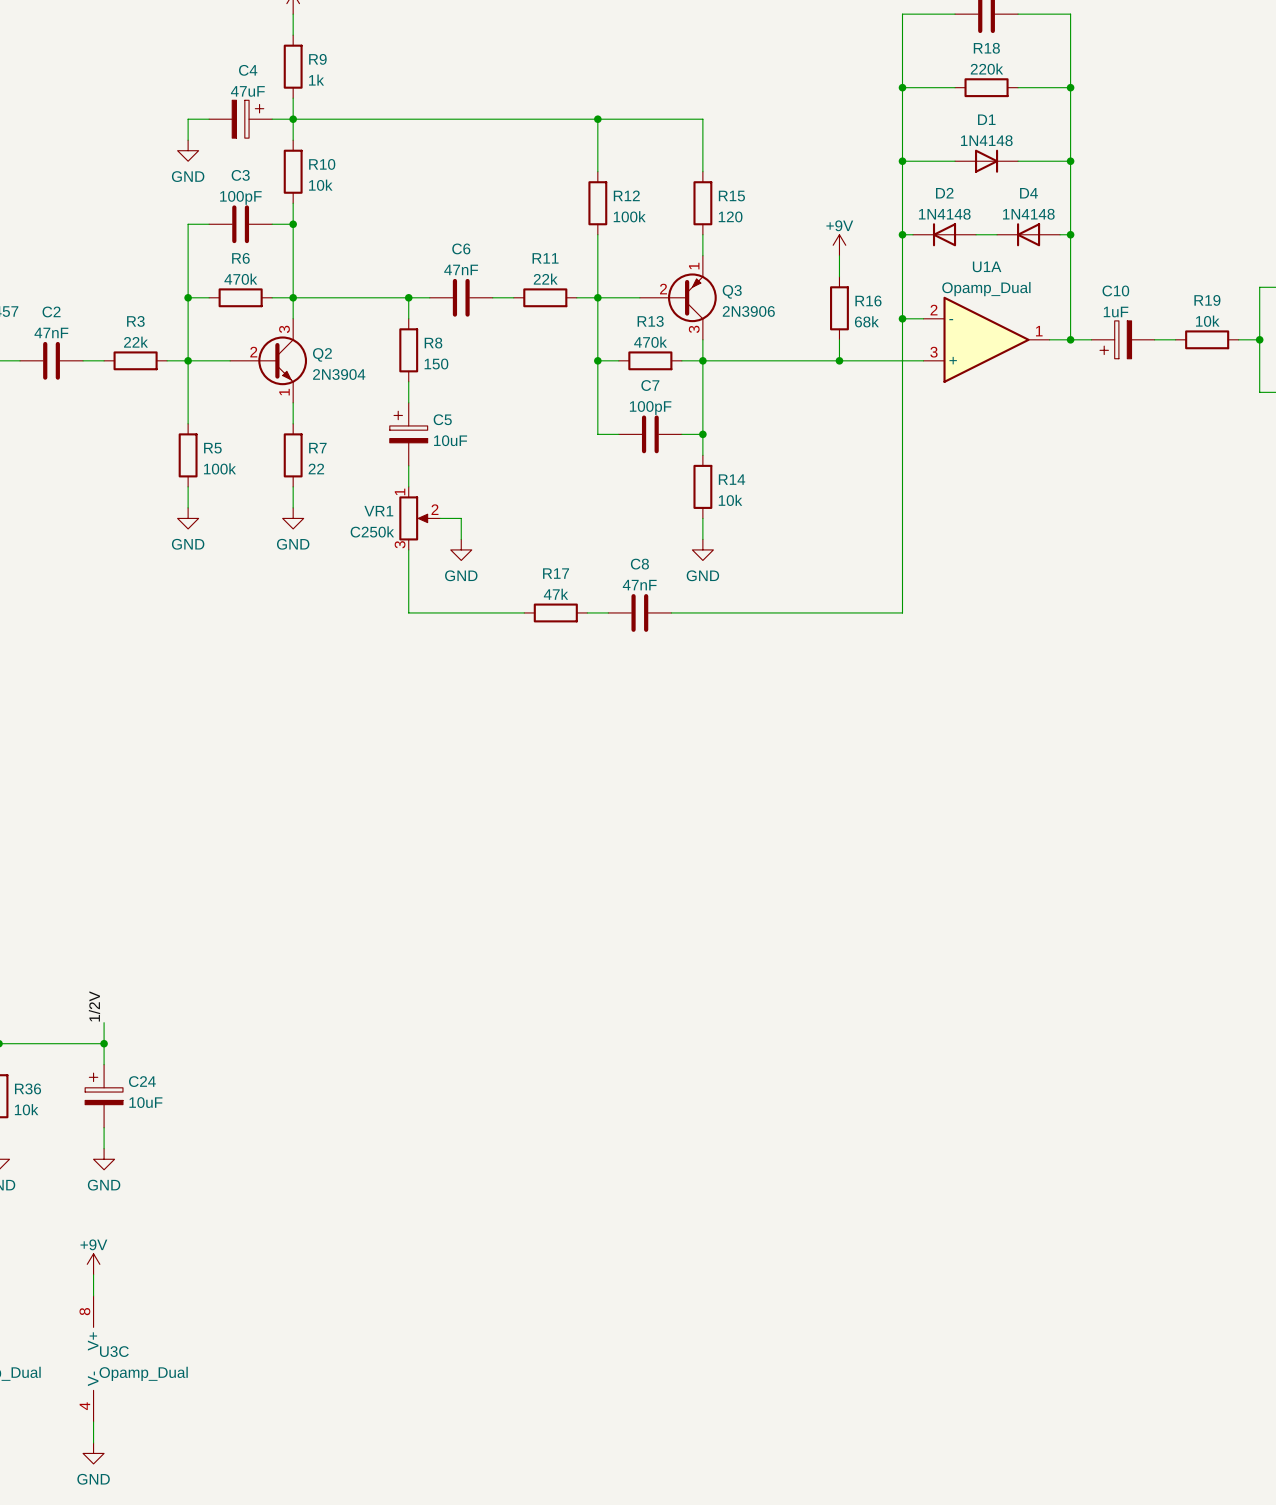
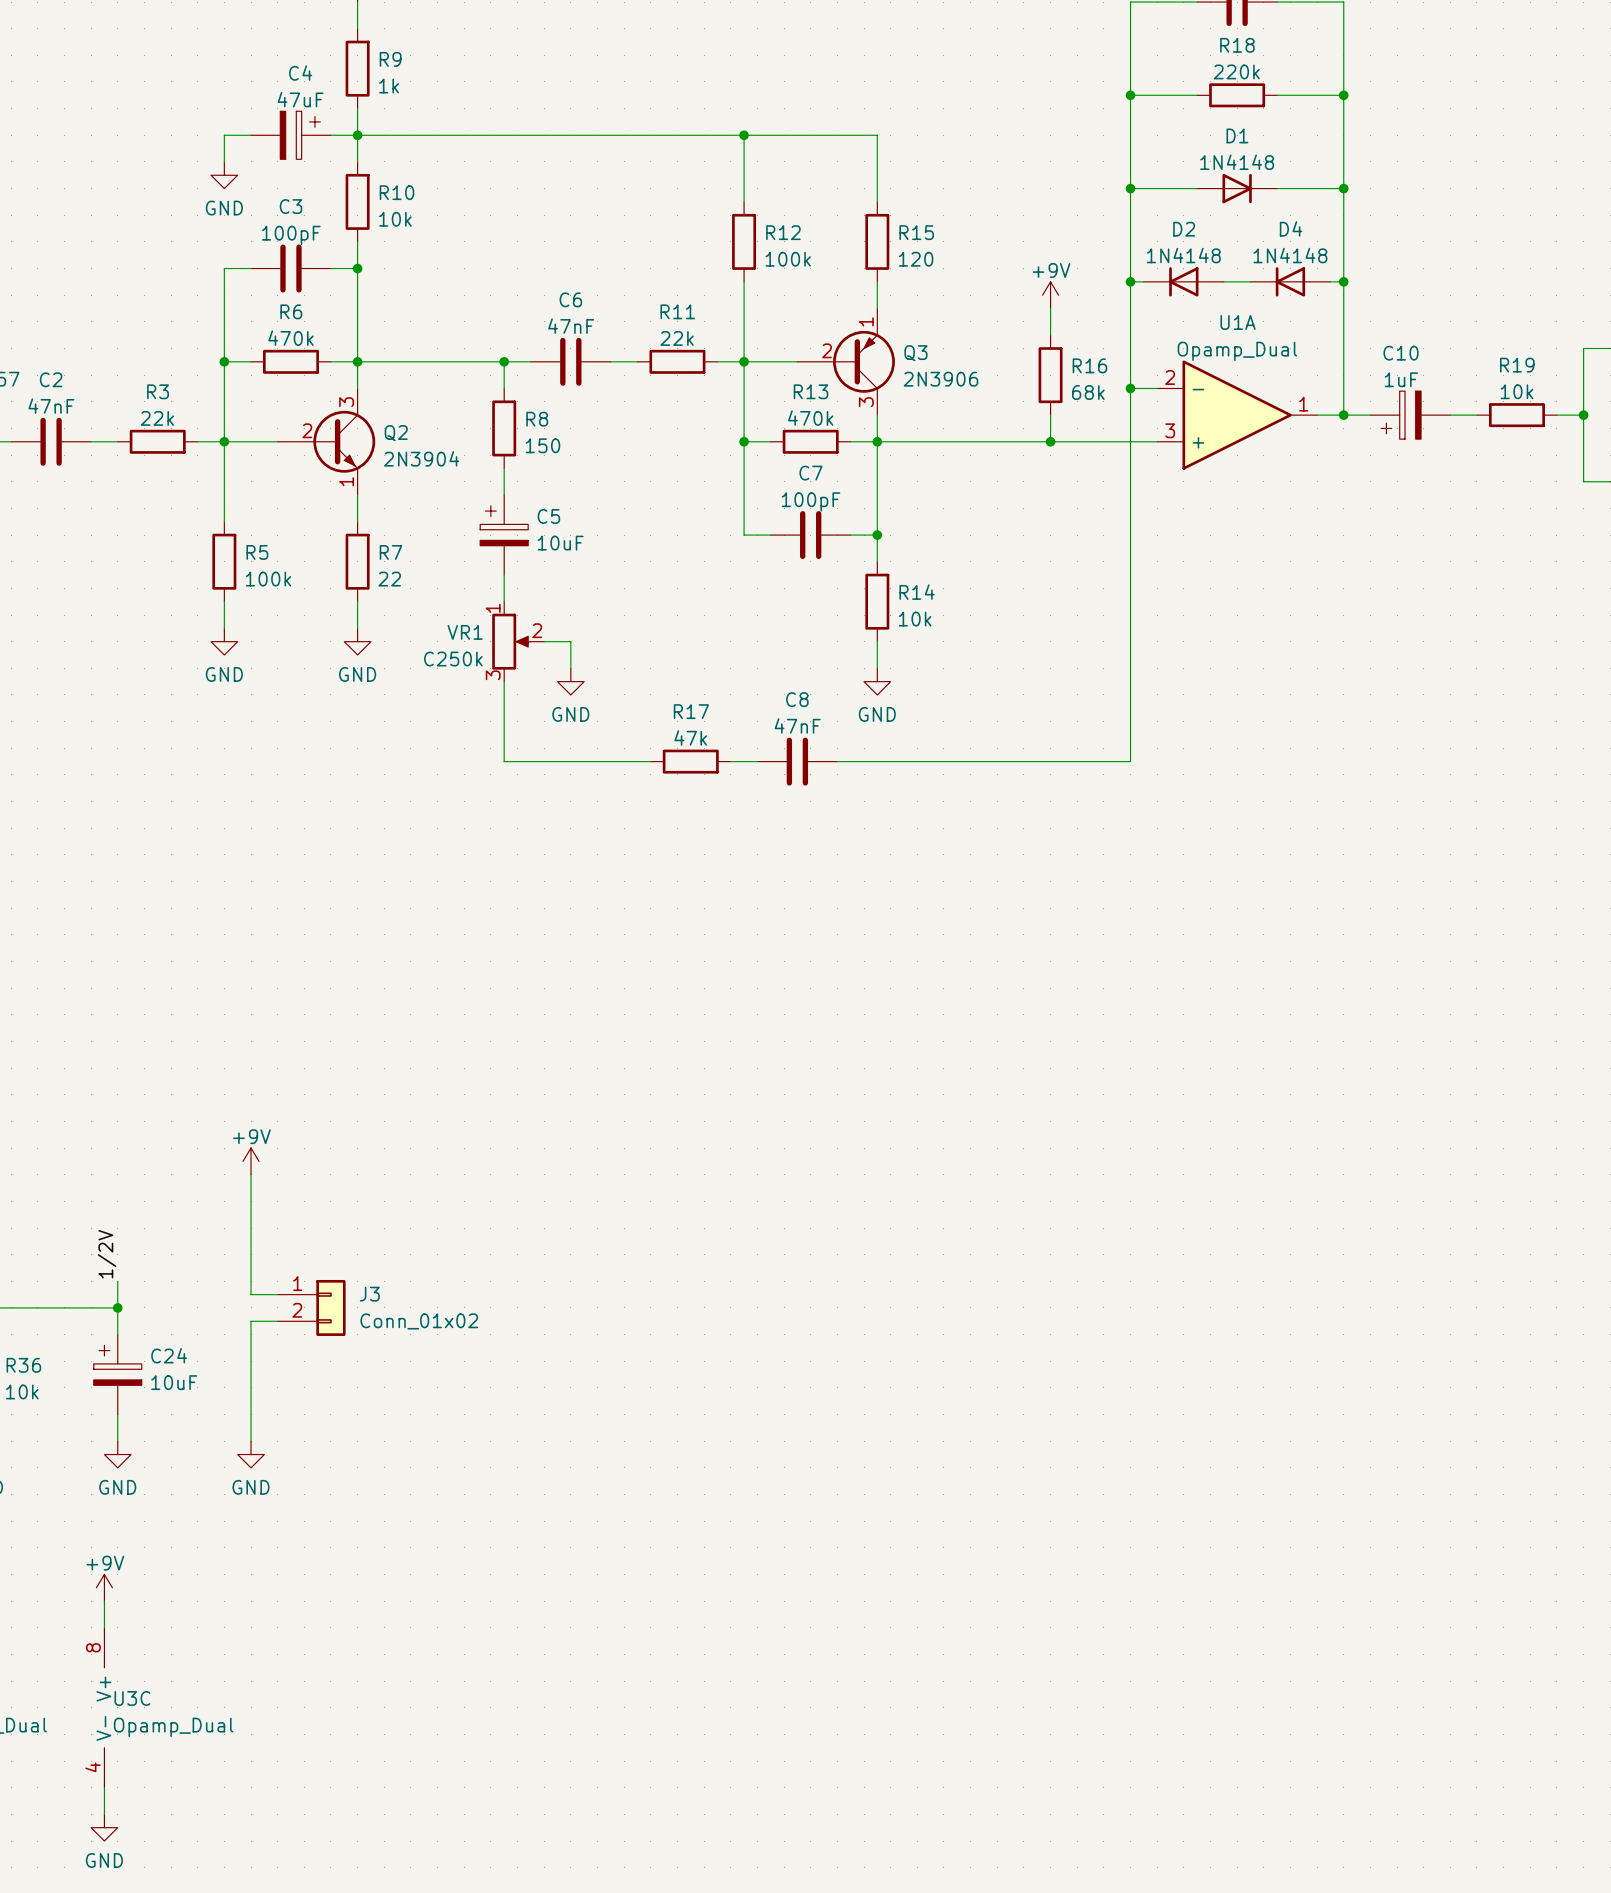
power symbol: none -> +9V (251, 1161)
wire: none -> (251, 1174) (251, 1294) (277, 1294)
J3: none -> Conn_01x02 (311, 1307)
wire: none -> (277, 1321) (251, 1321) (251, 1441)
power symbol: none -> GND (251, 1454)

